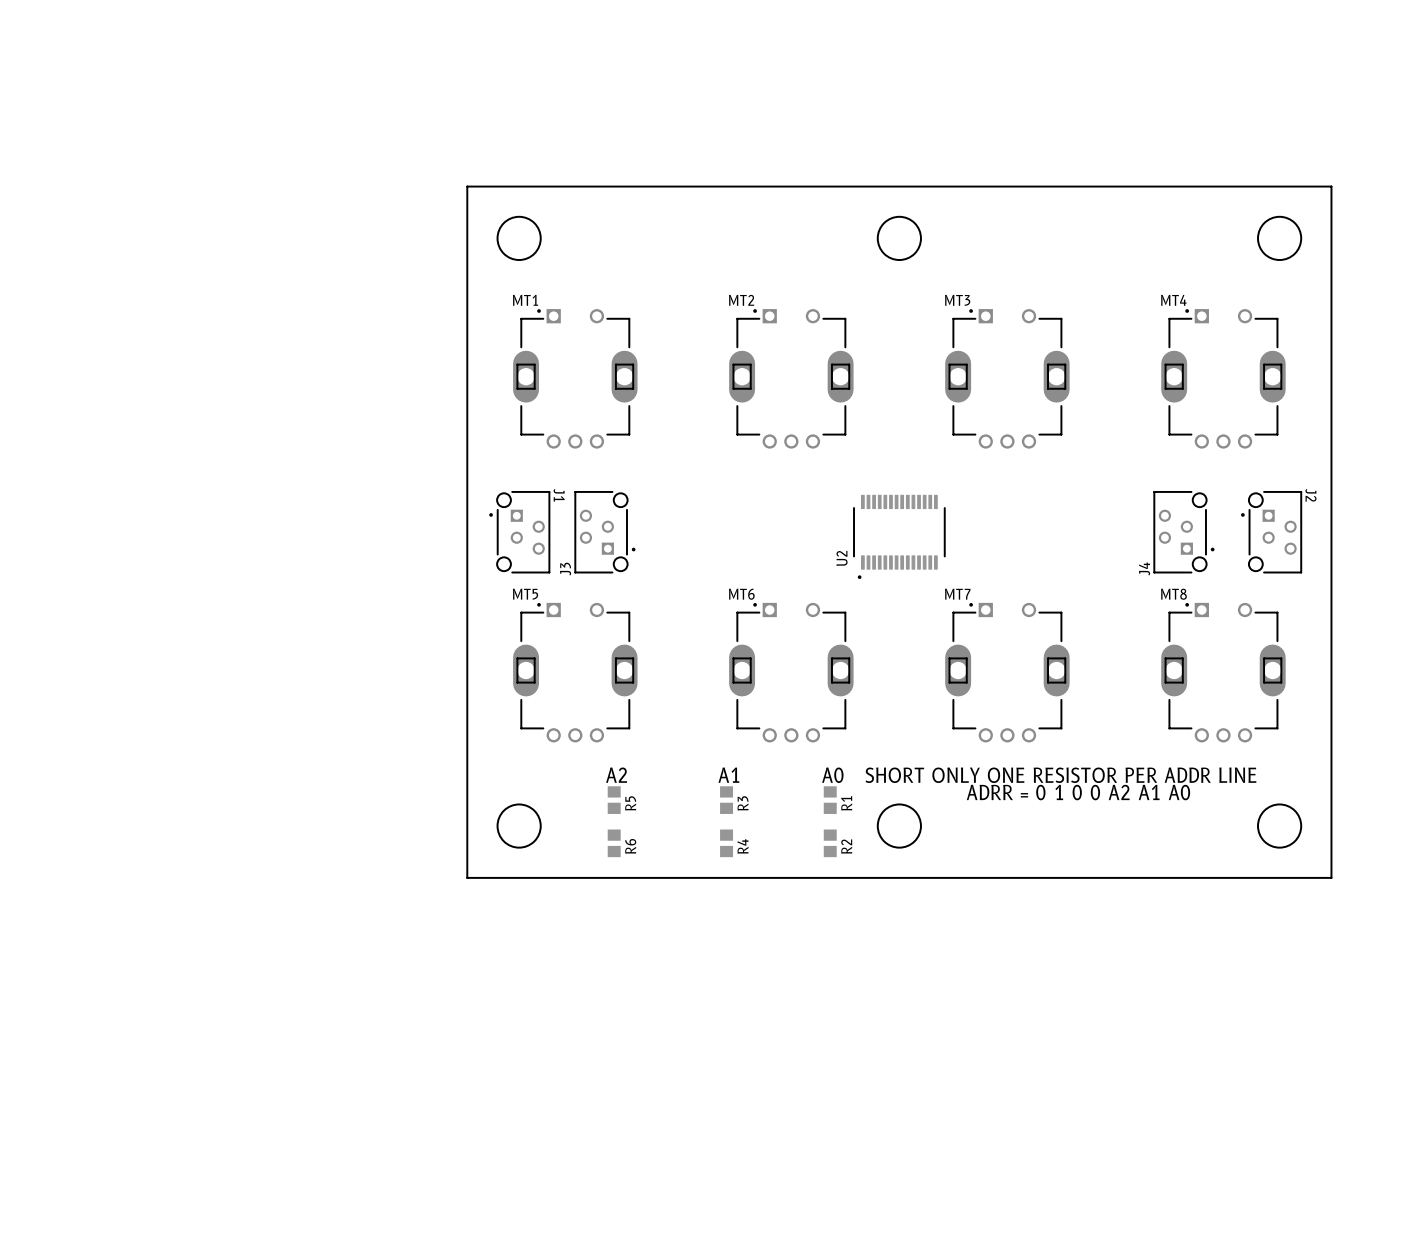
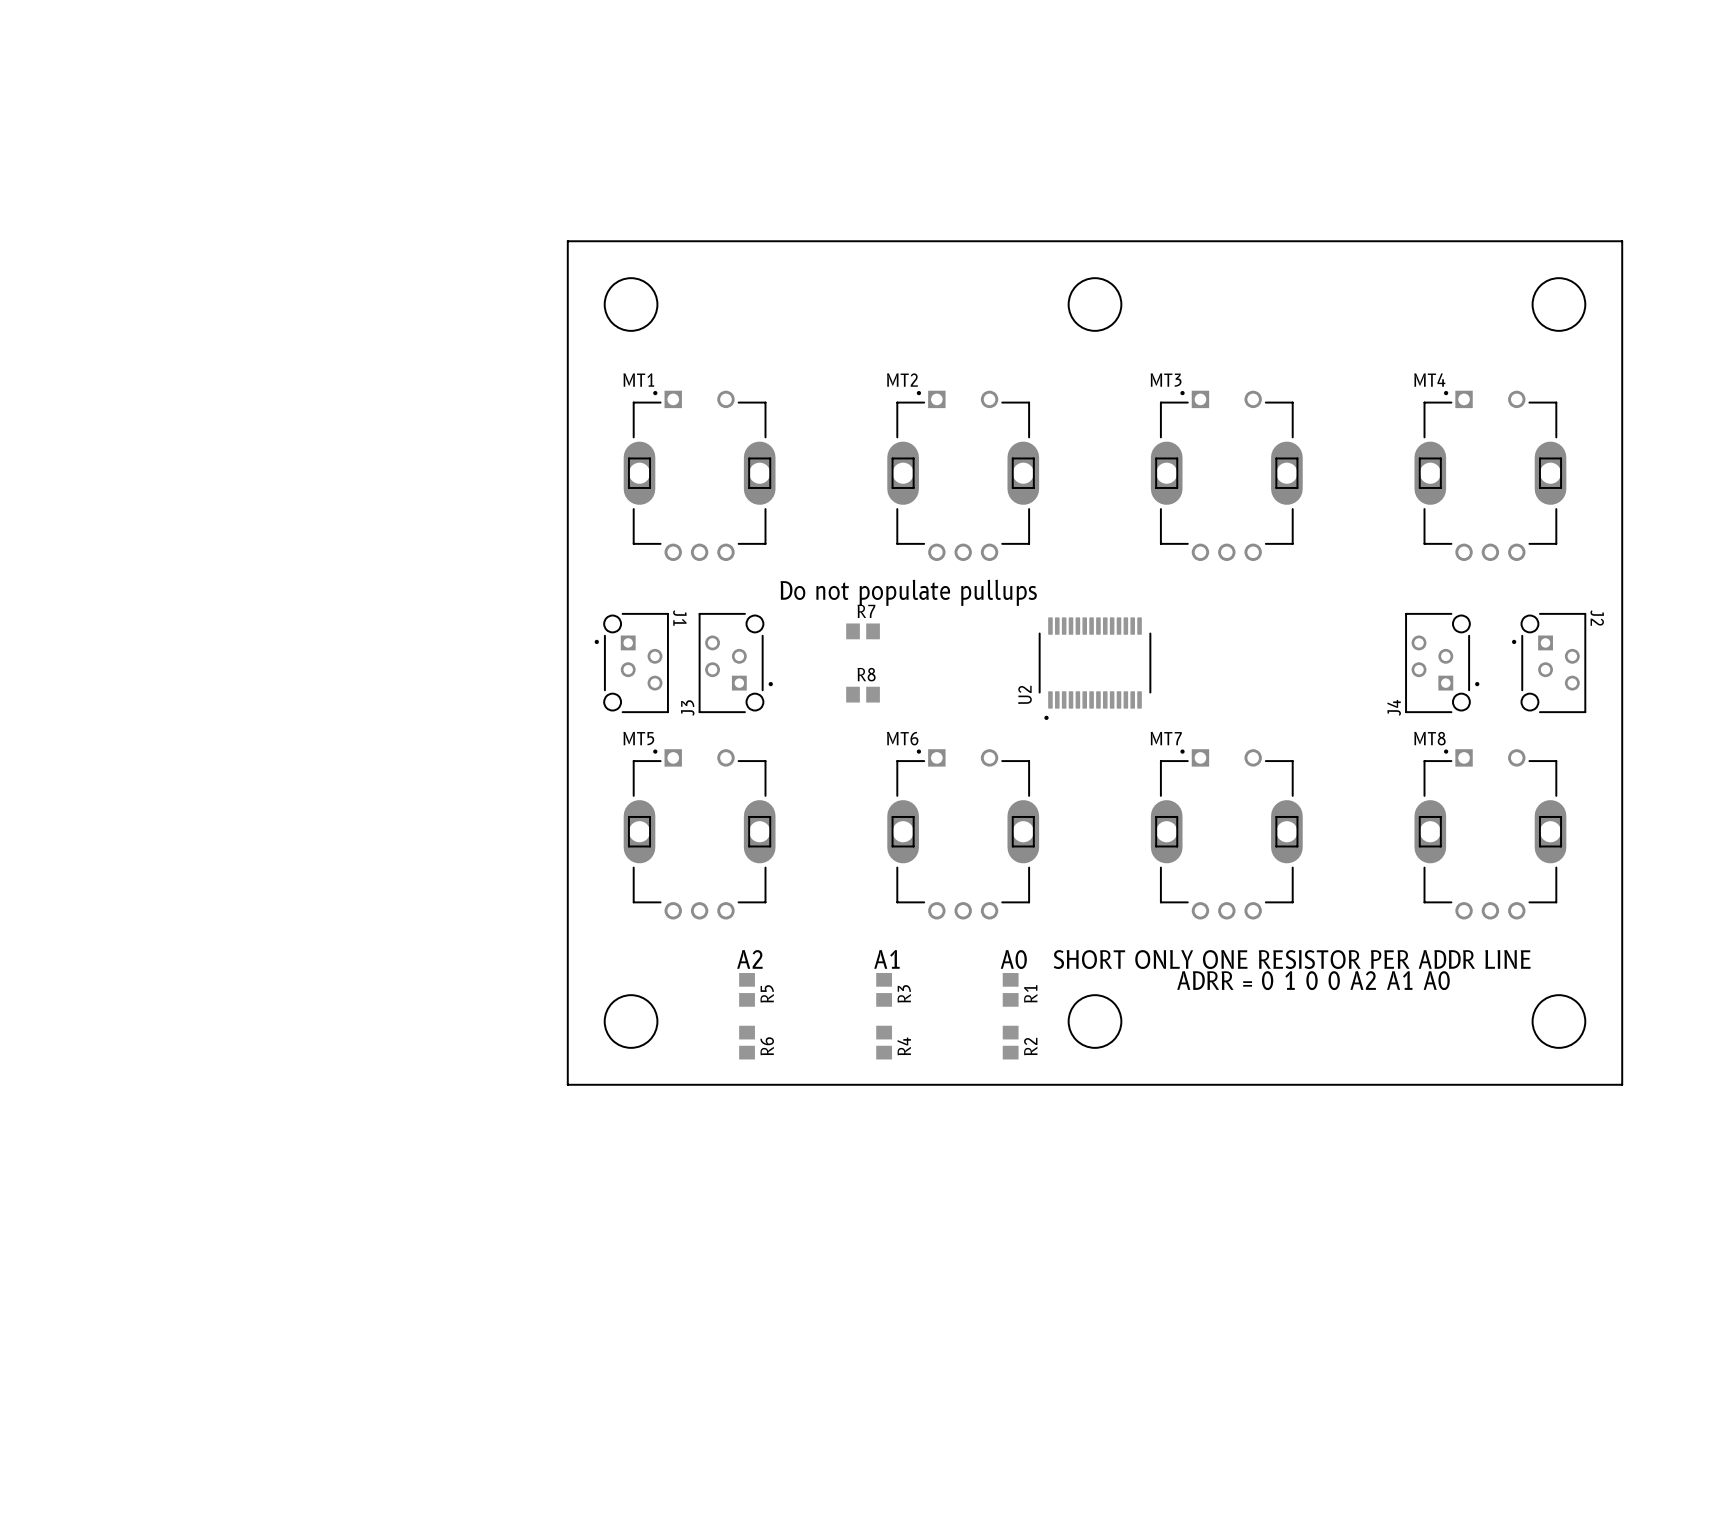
text: none -> Do not populate pullups (908, 592)
R7: none -> (863, 631)
R8: none -> (863, 694)

